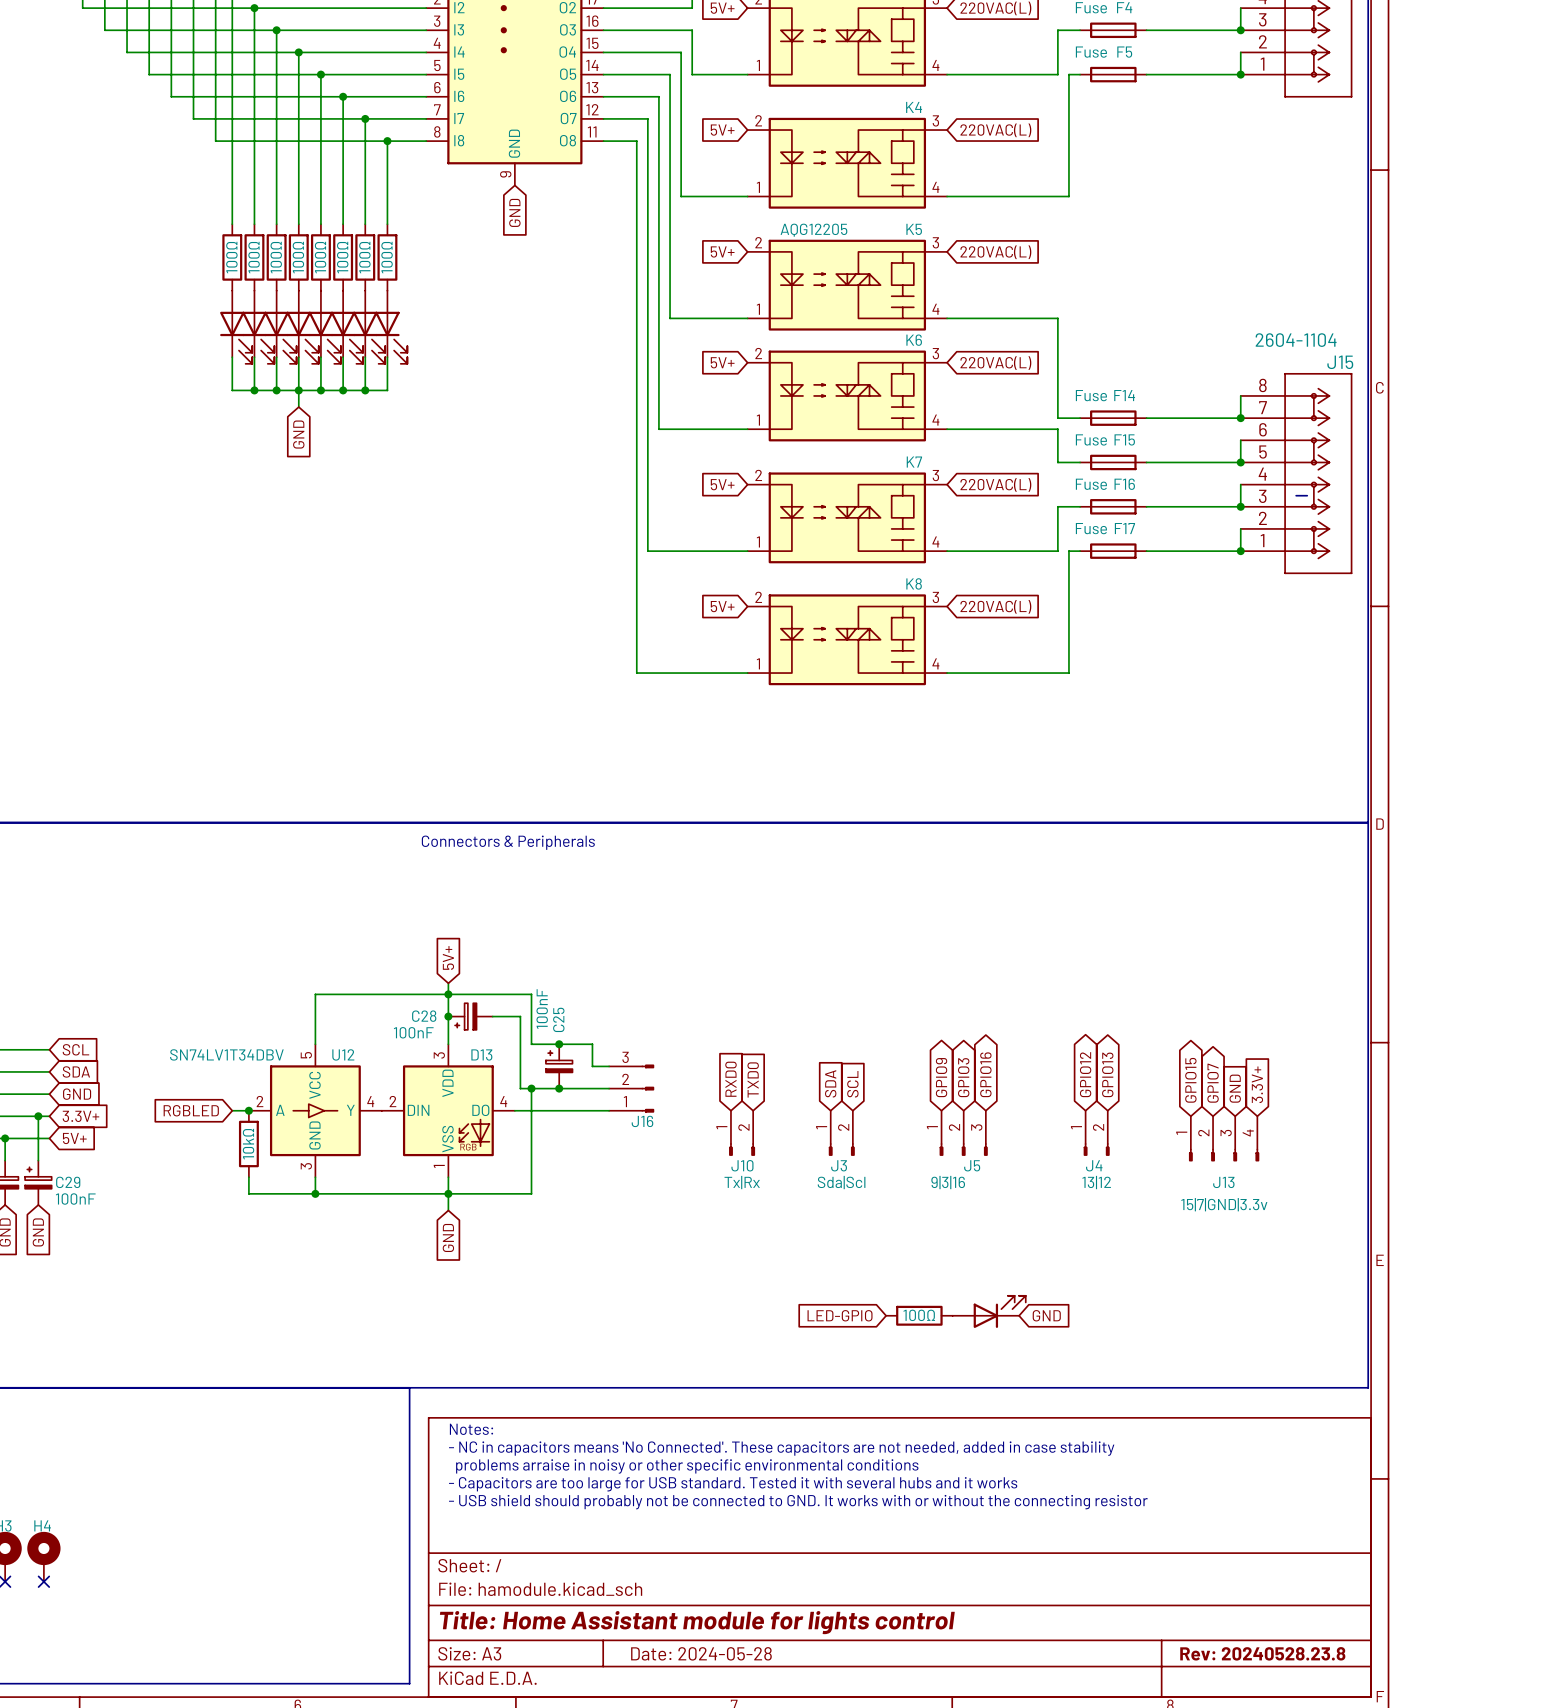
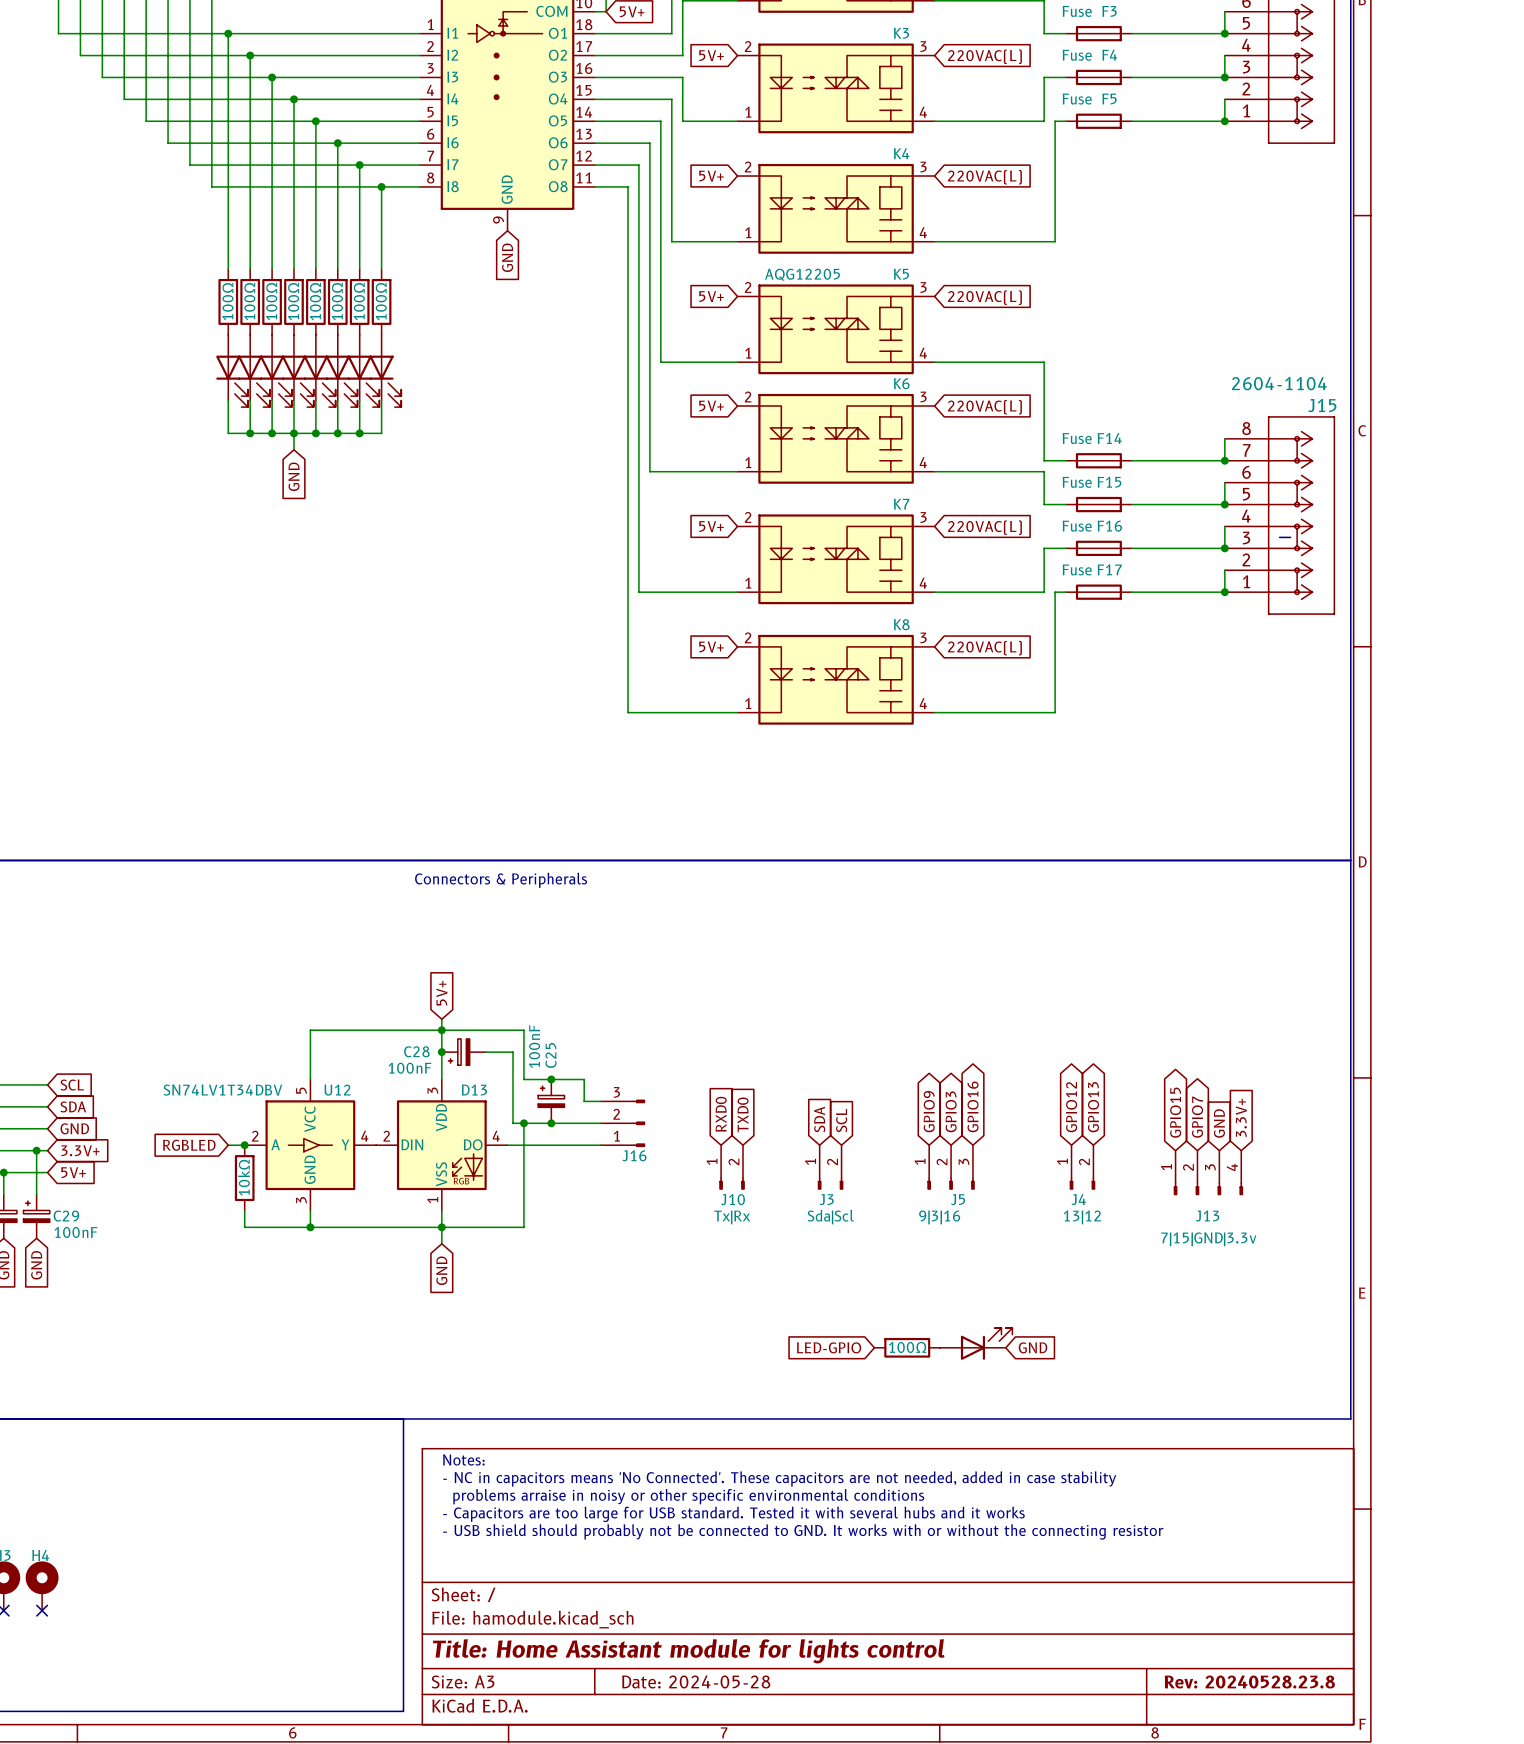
J13 value: 15|7|GND|3.3v (1224, 1204) -> 7|15|GND|3.3v (1208, 1239)

